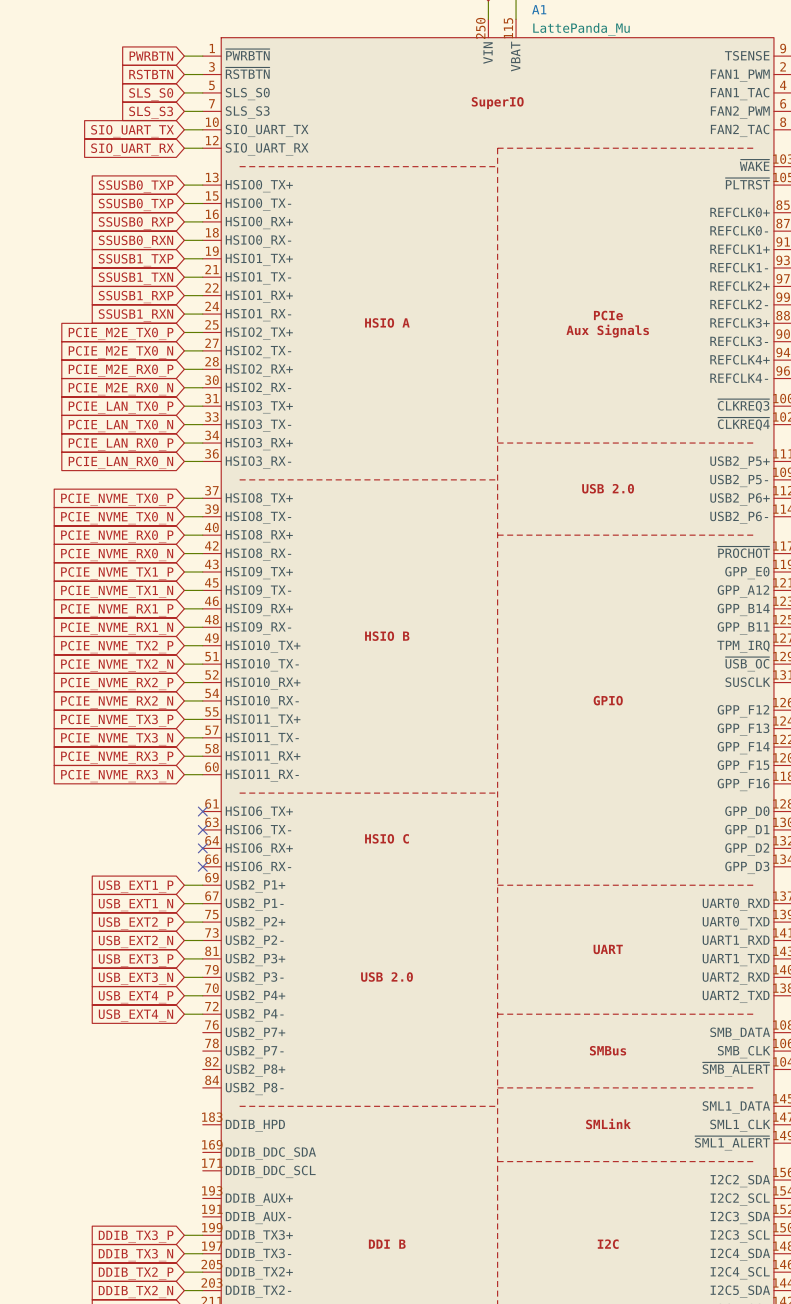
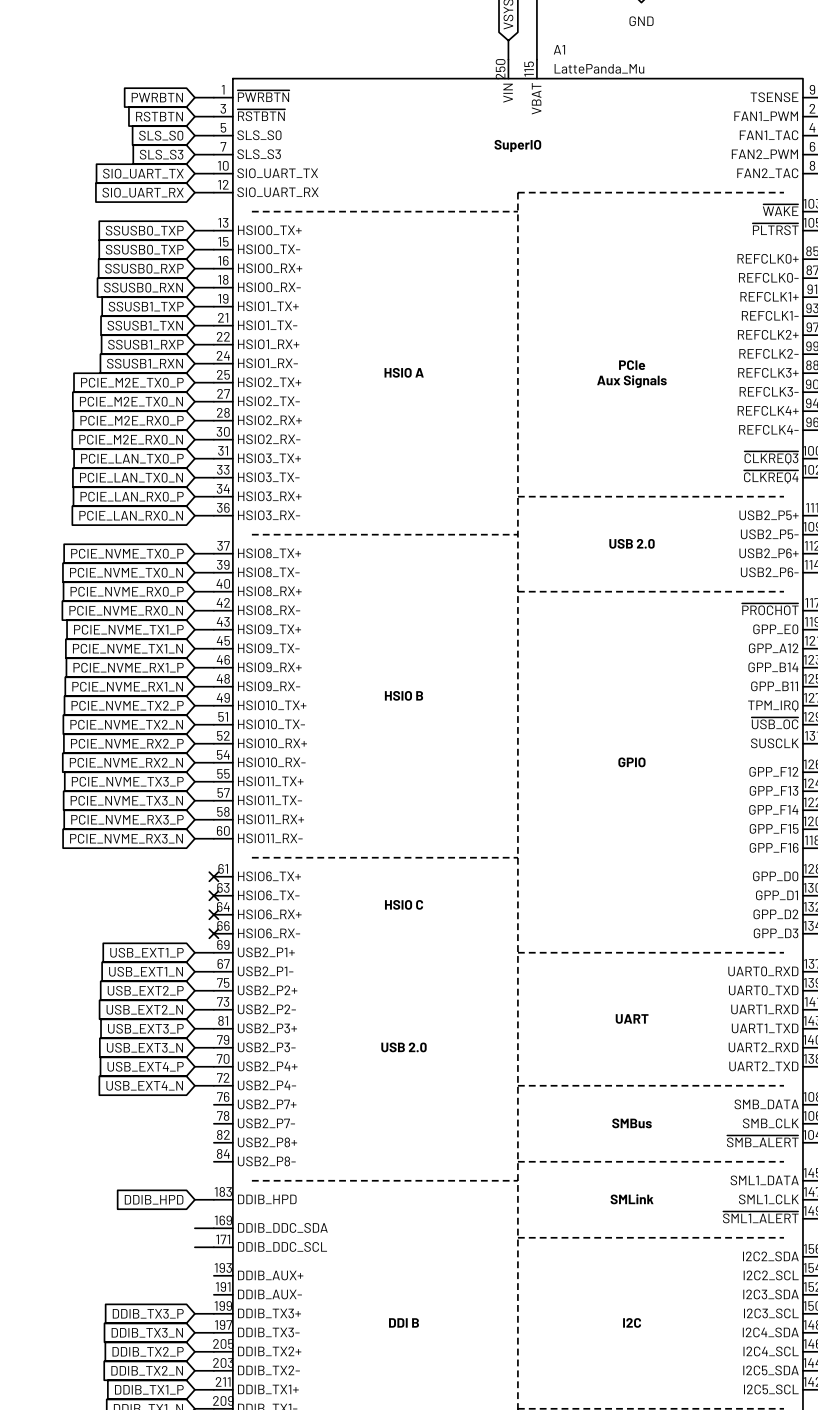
wire: none -> (194, 1199) (213, 1199)
global label: none -> DDIB_HPD (154, 1199)
wire: none -> (194, 1228) (213, 1228)
wire: none -> (194, 1247) (213, 1247)

